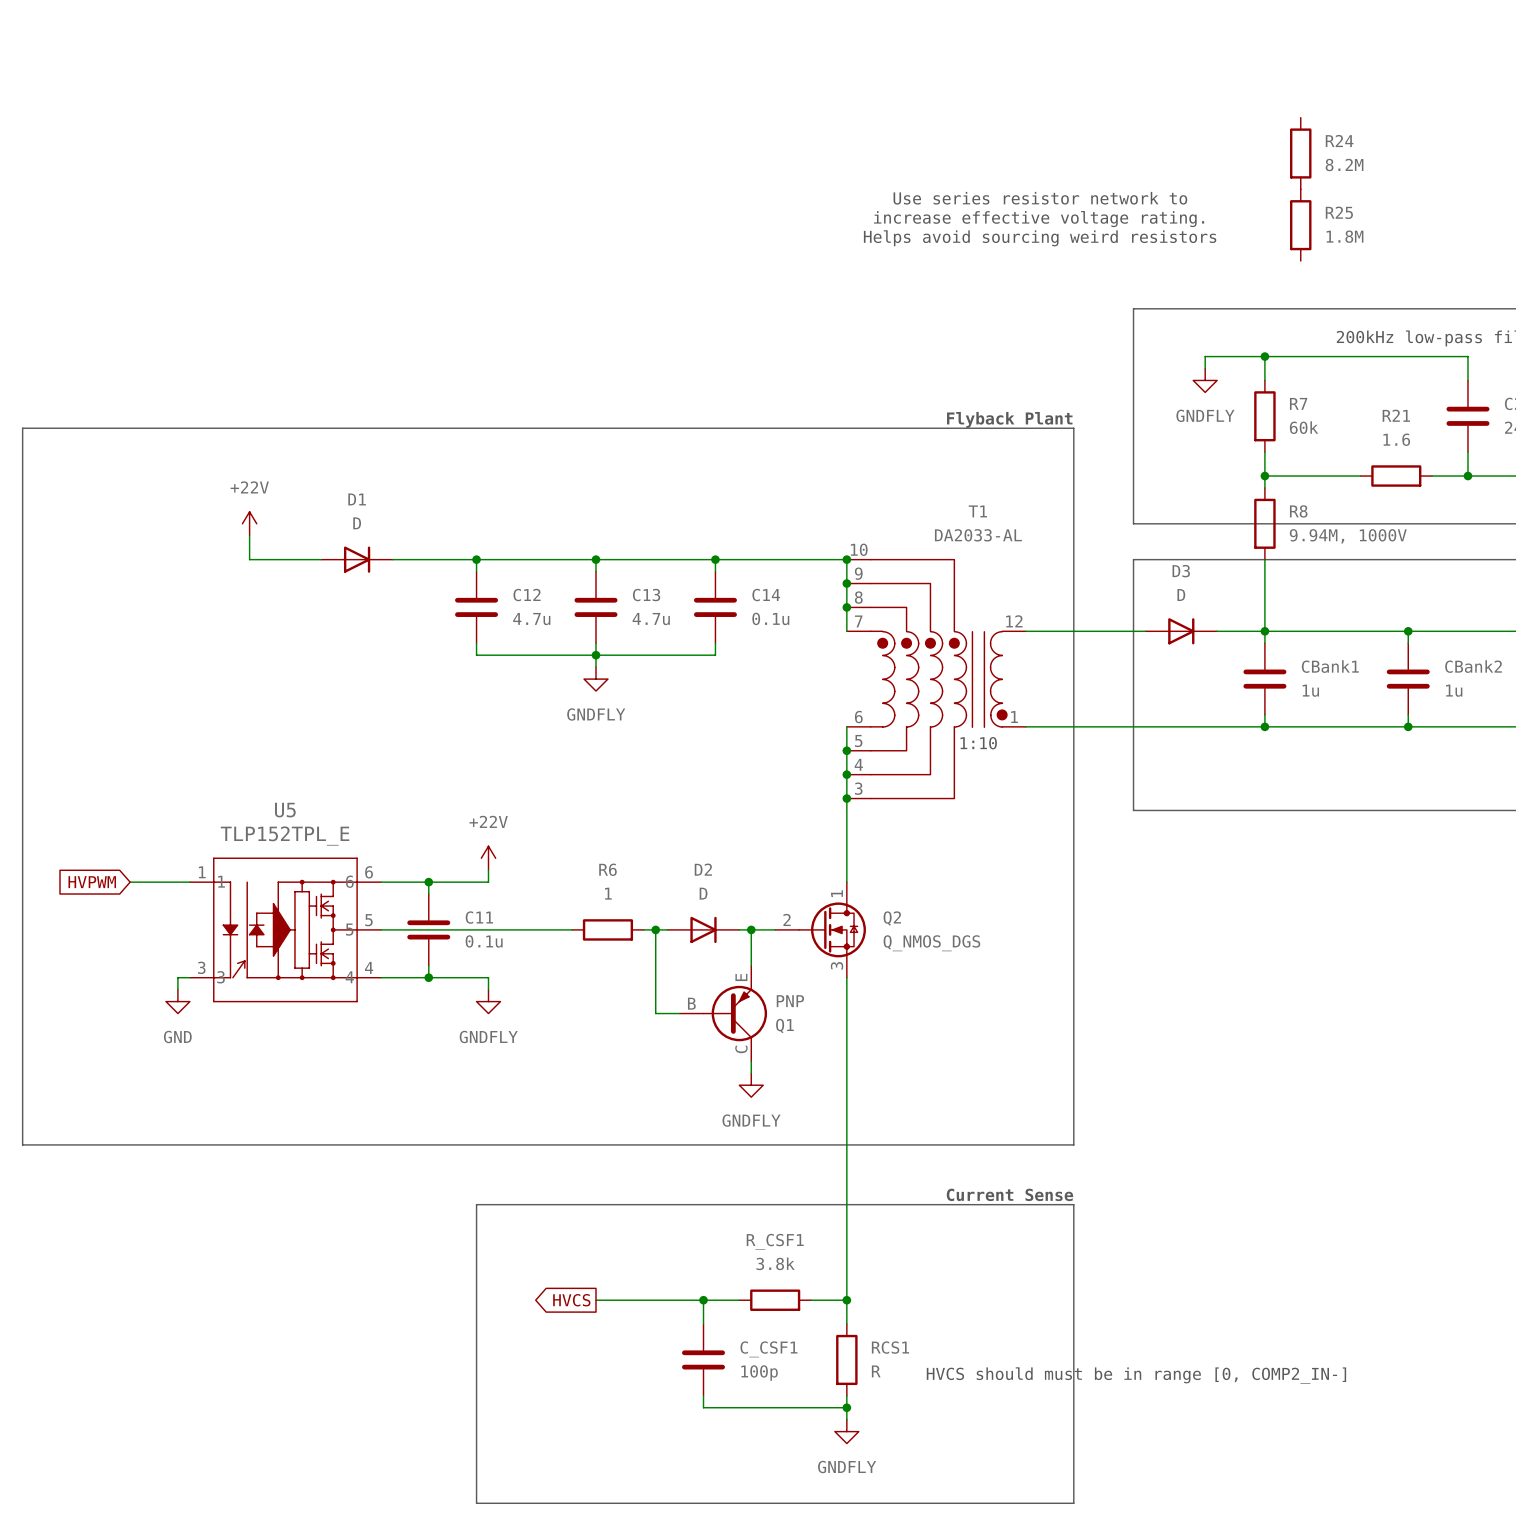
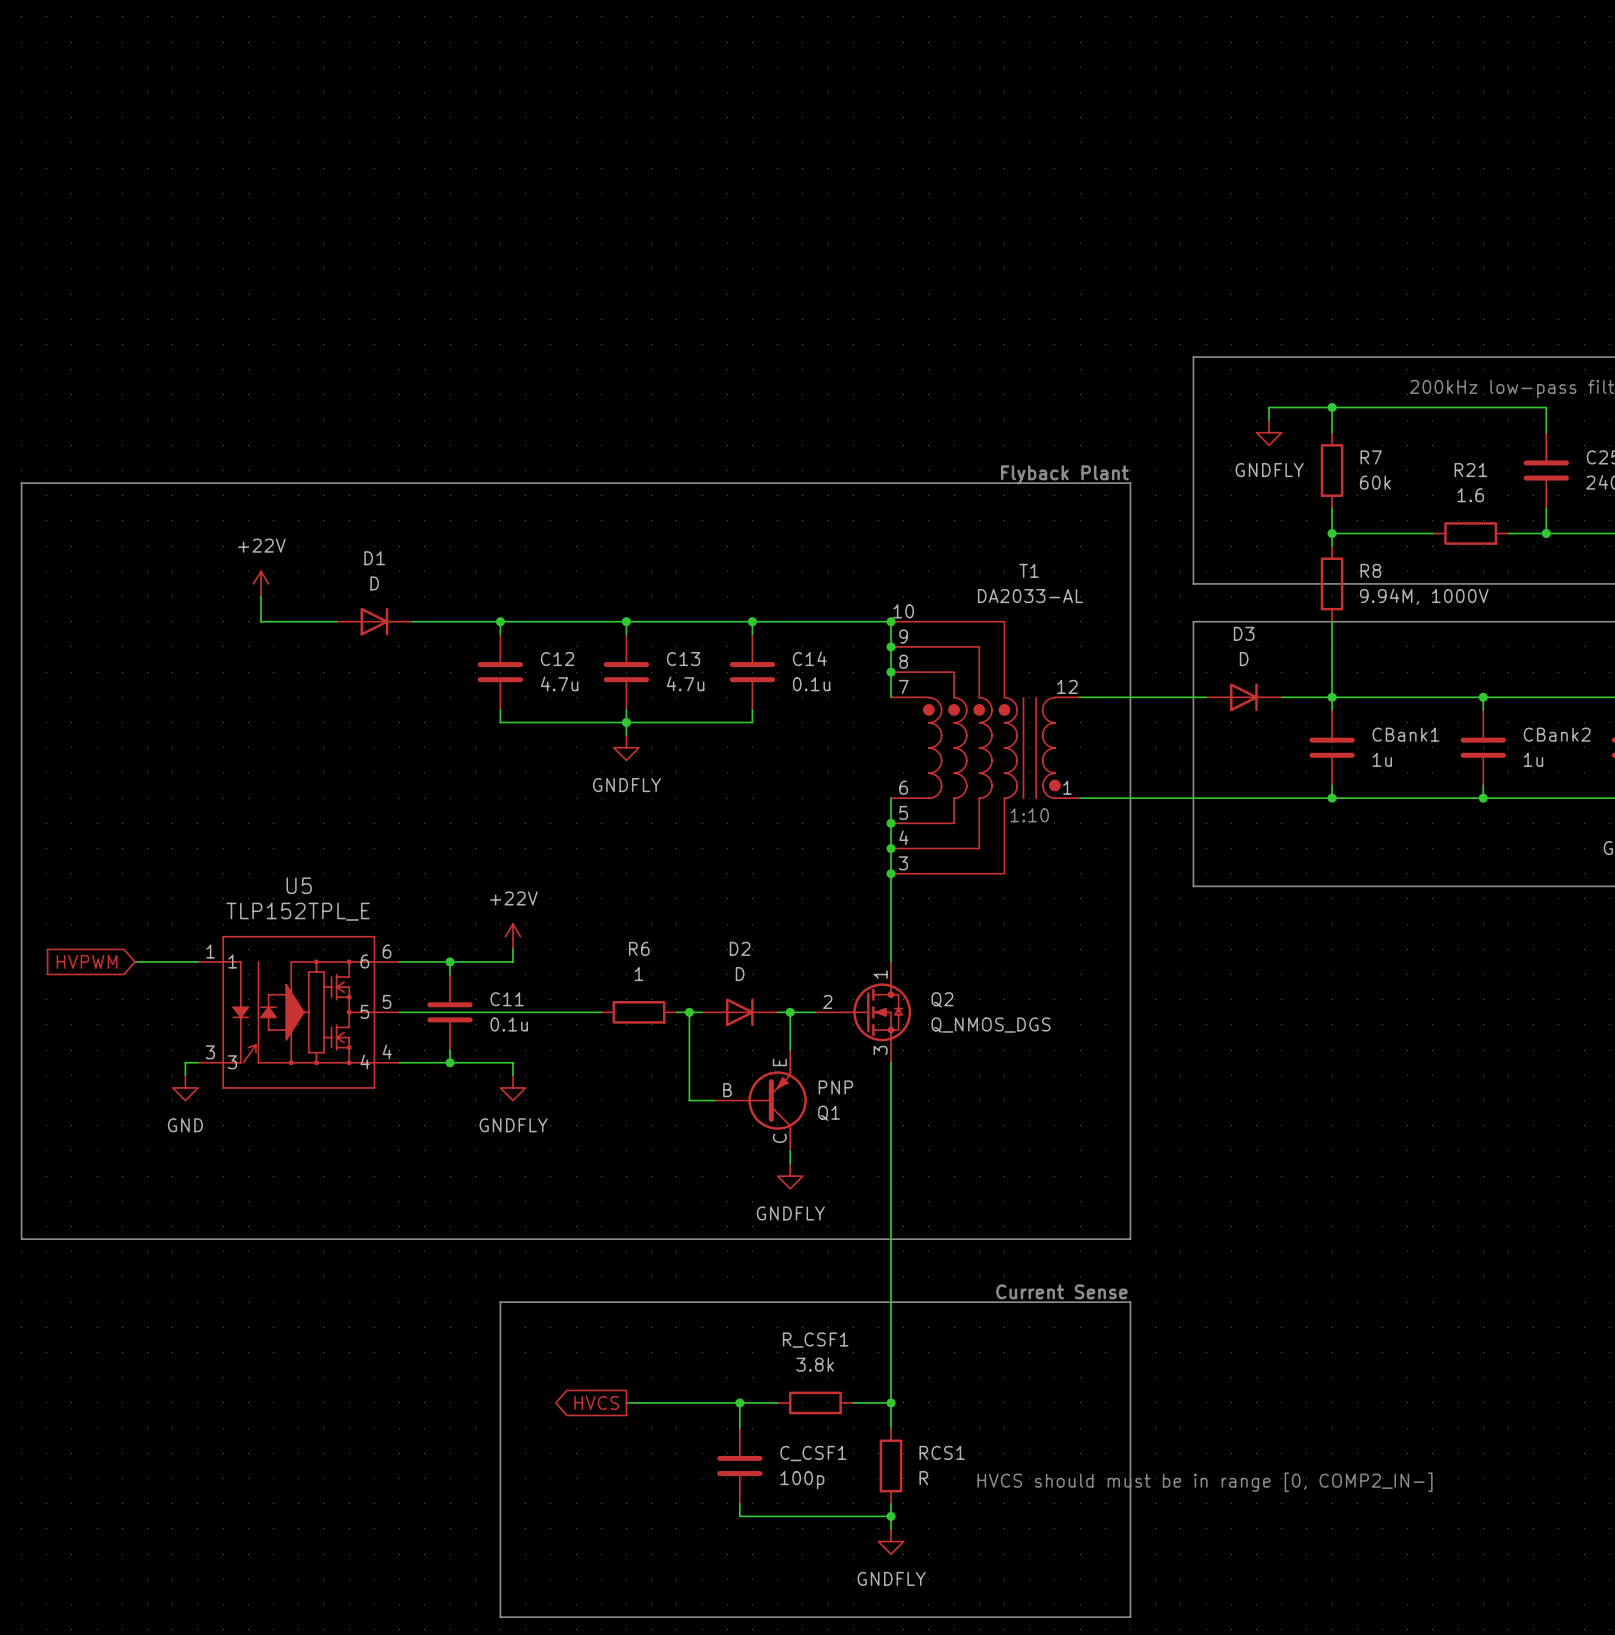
R24: 8.2M (1300, 153) -> none
text: Use series resistor network to (1040, 198) -> none
text: increase effective voltage rating. (1039, 219) -> none
R25: 1.8M (1300, 225) -> none
text: Helps avoid sourcing weird resistors (1040, 238) -> none

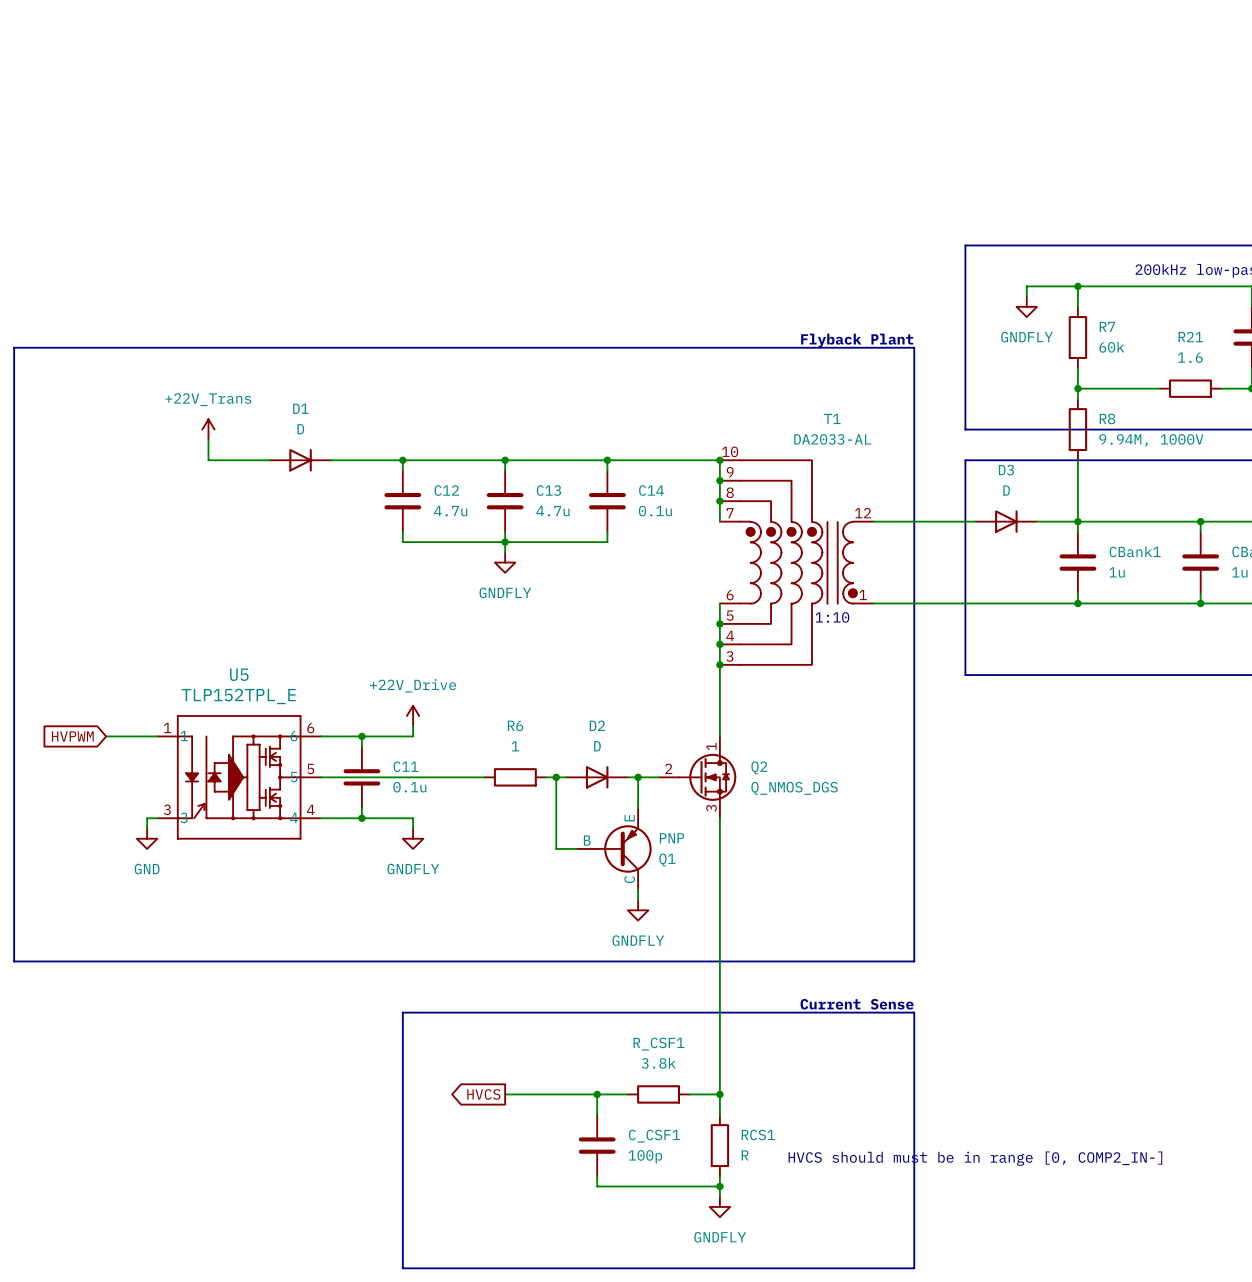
power symbol: +22V (260, 583) -> +22V_Trans (208, 429)
power symbol: +22V (513, 936) -> +22V_Drive (413, 715)

